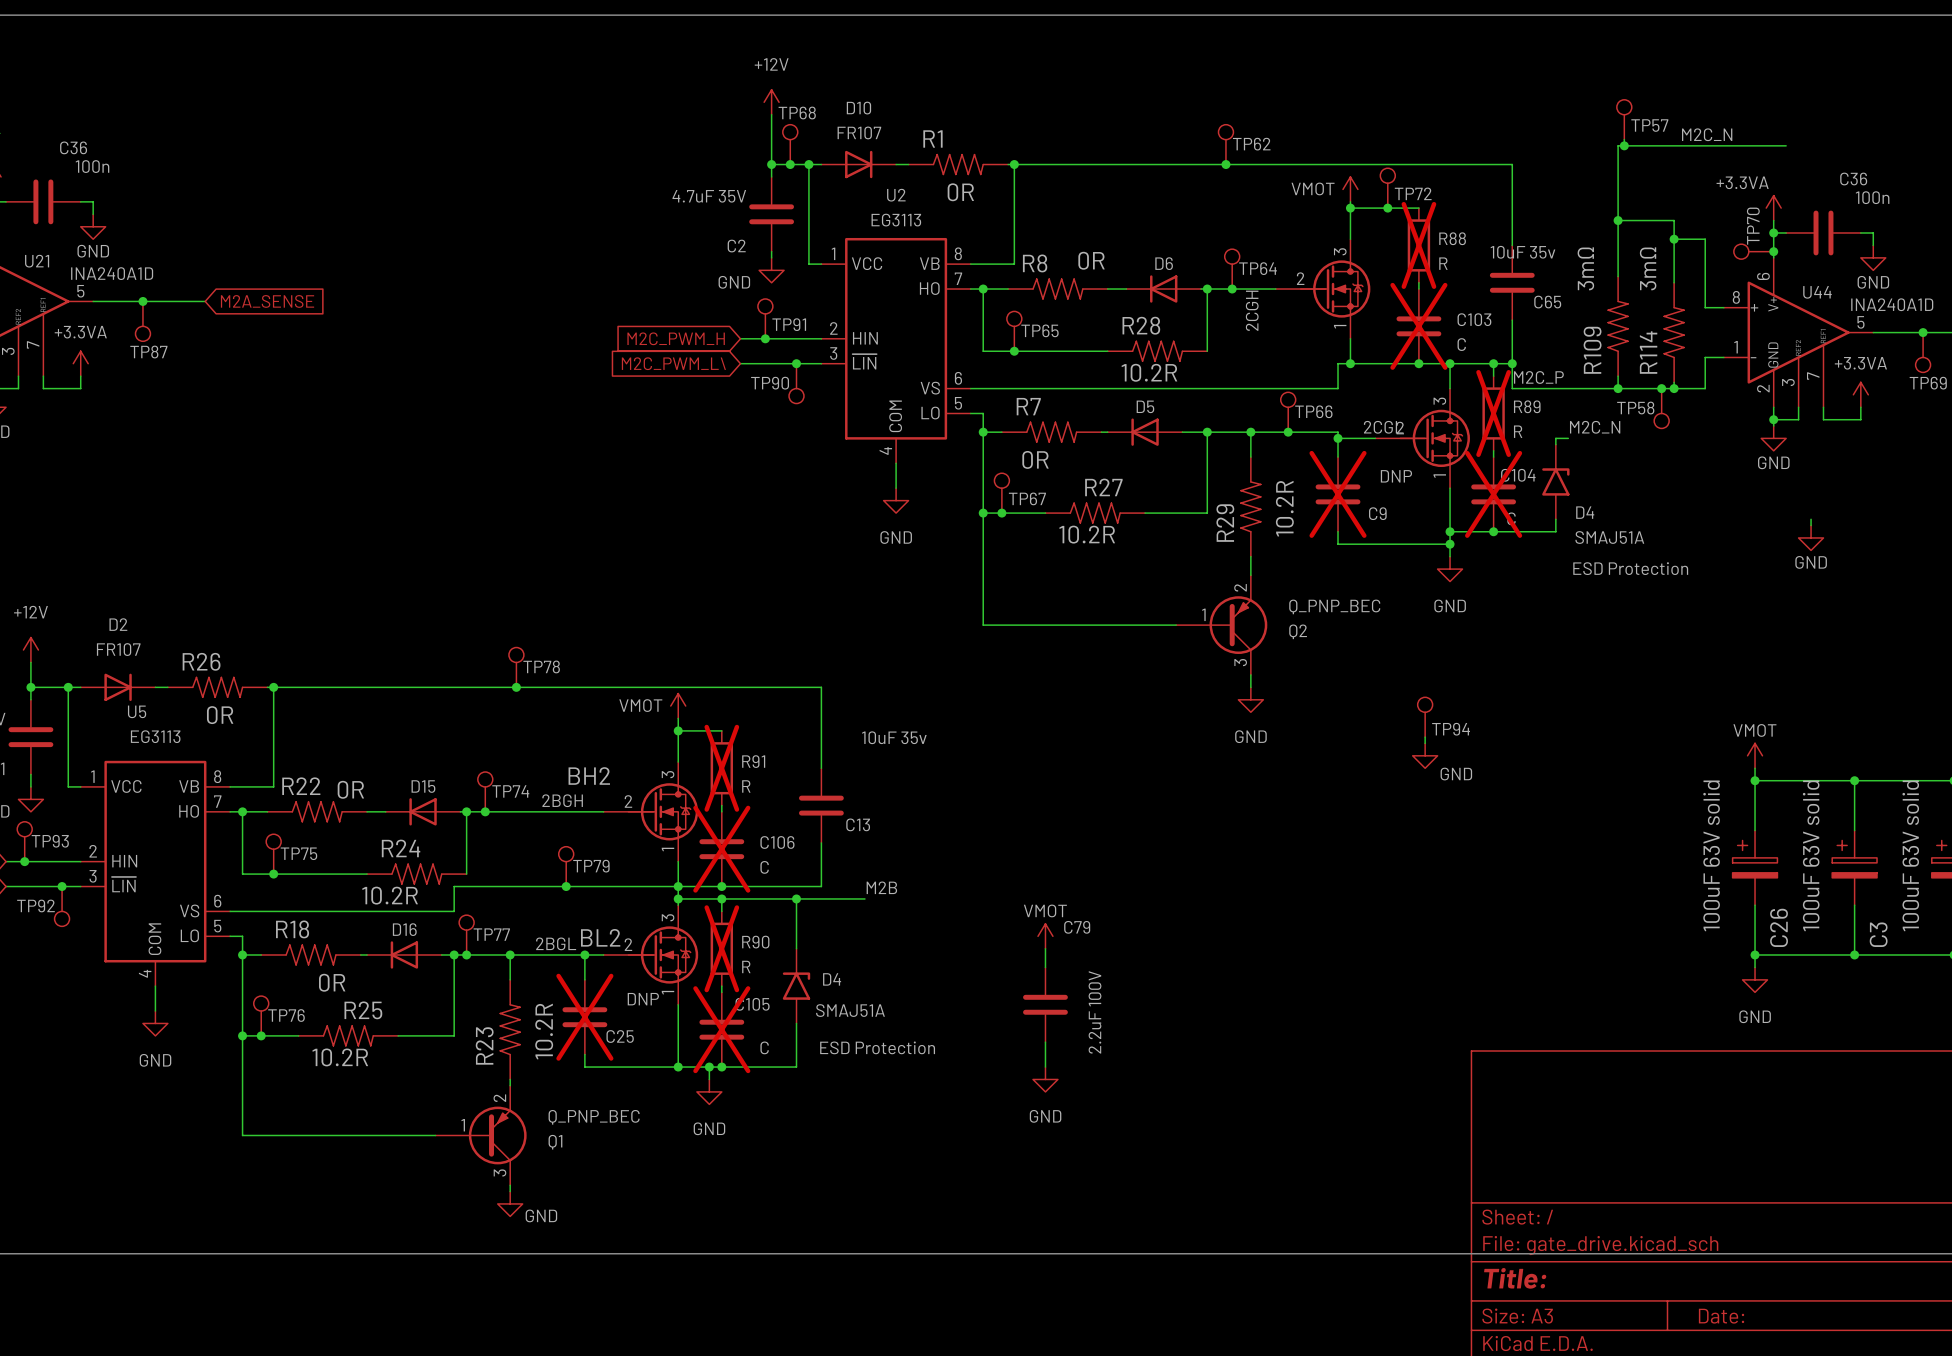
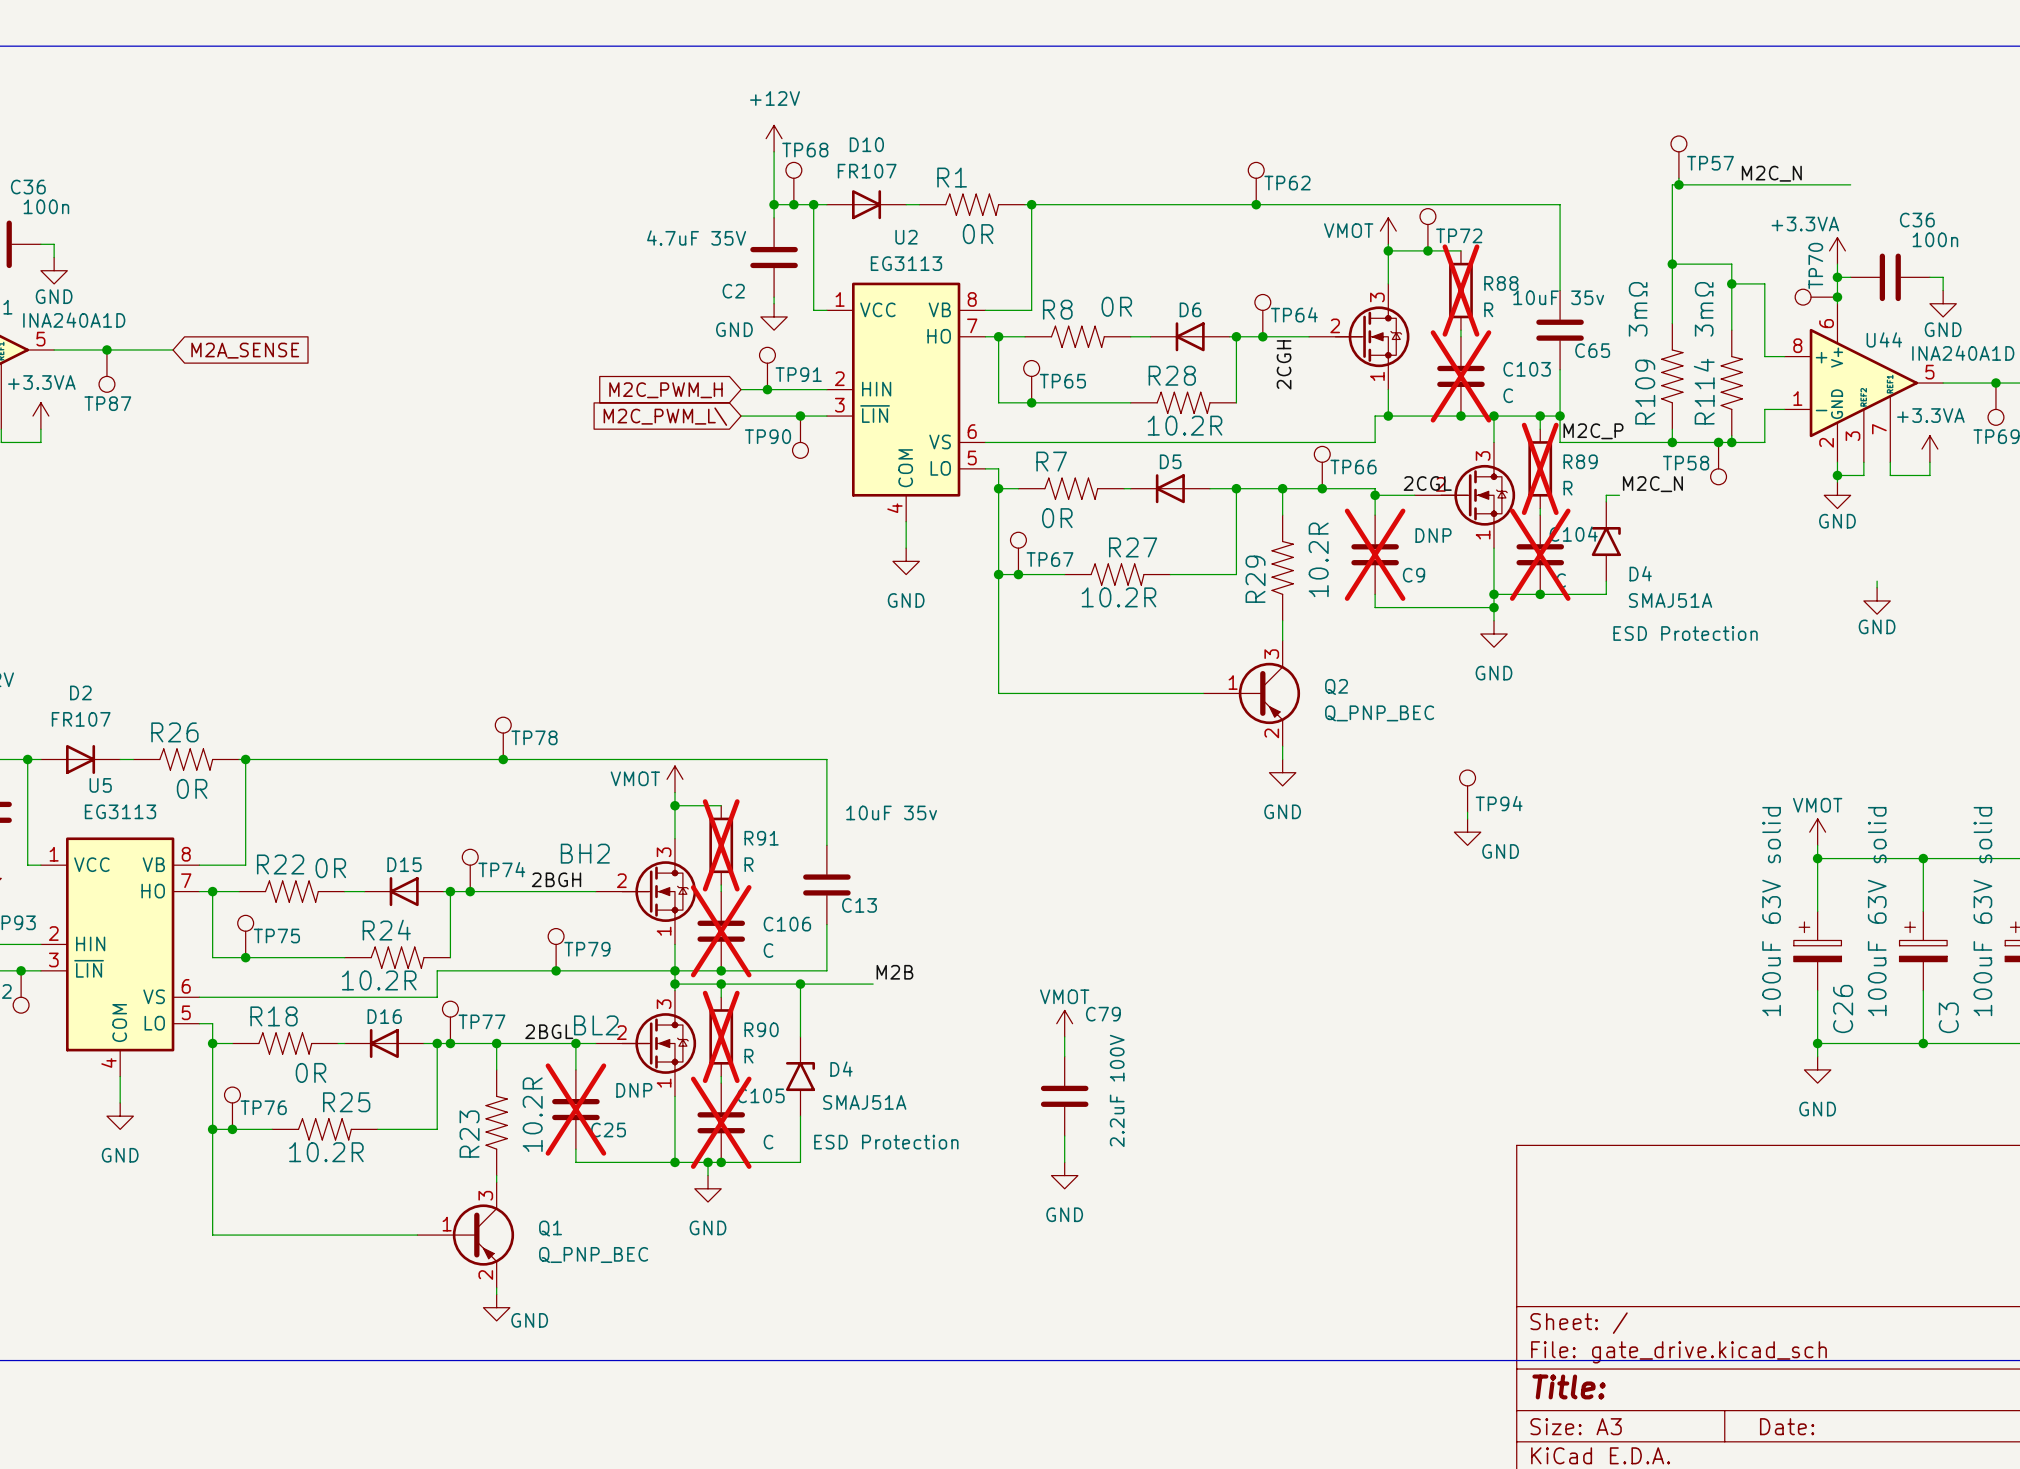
Q2 flip: as is (1238, 625) -> up-down (1269, 693)
Q1 flip: as is (497, 1135) -> up-down (483, 1235)

